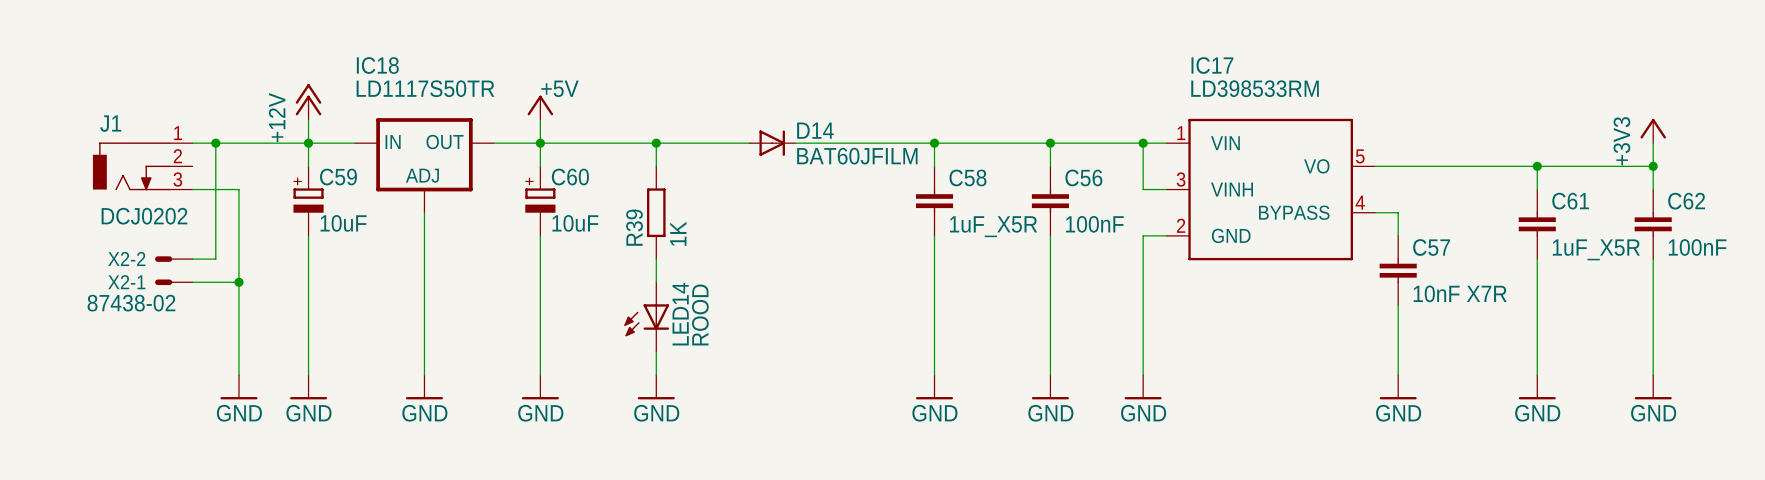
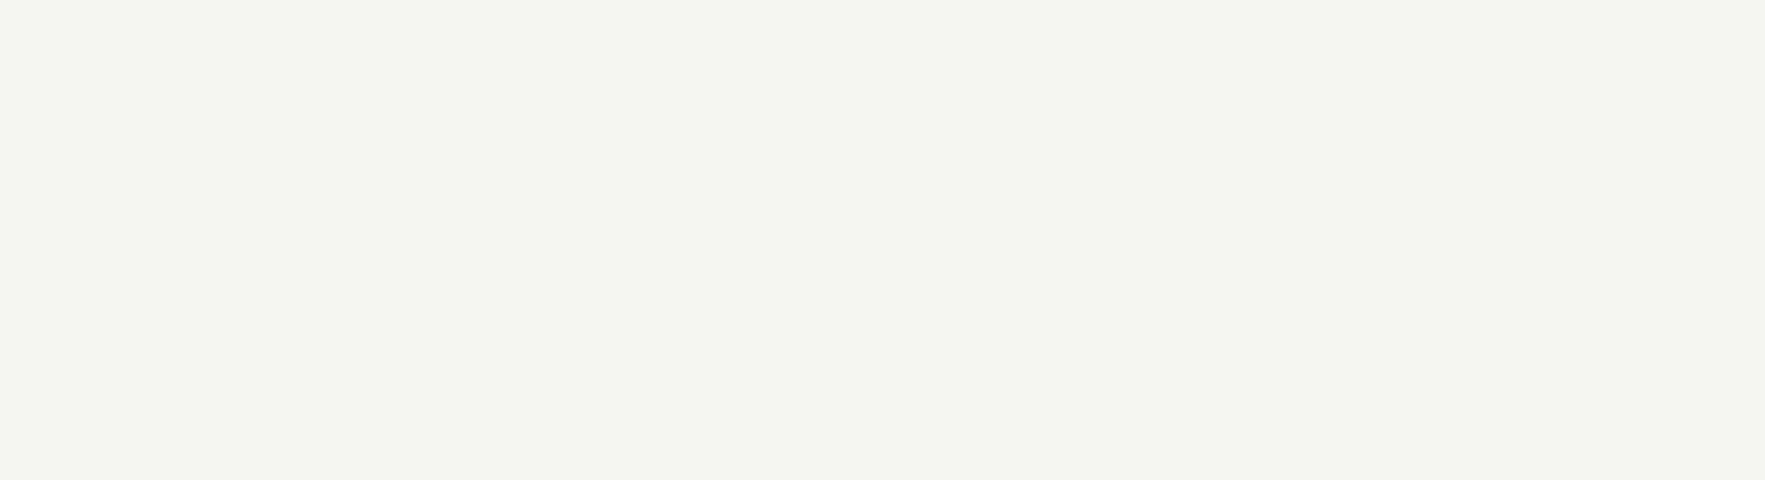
power symbol: +12V (308, 102) -> none
power symbol: +5V (540, 107) -> none
wire: (308, 119) (308, 166) -> none
wire: (540, 119) (540, 166) -> none
power symbol: +3V3 (1653, 131) -> none
wire: (192, 143) (354, 143) -> none
wire: (215, 143) (215, 259) (192, 259) -> none
junction: (215, 143) -> none
junction: (308, 143) -> none
wire: (494, 143) (749, 143) -> none
junction: (540, 143) -> none
wire: (656, 143) (656, 166) -> none
junction: (656, 143) -> none
D14: BAT60JFILM (772, 143) -> none
wire: (795, 143) (1166, 143) -> none
wire: (934, 143) (934, 166) -> none
junction: (934, 143) -> none
wire: (1050, 143) (1050, 166) -> none
junction: (1050, 143) -> none
wire: (1143, 143) (1143, 189) (1166, 189) -> none
junction: (1143, 143) -> none
wire: (1653, 143) (1653, 189) -> none
IC18: LD1117S50TR (424, 165) -> none
J1: DCJ0202 (142, 166) -> none
wire: (1375, 166) (1653, 166) -> none
wire: (1537, 166) (1537, 189) -> none
junction: (1537, 166) -> none
junction: (1653, 166) -> none
wire: (192, 189) (238, 189) (238, 375) -> none
IC17: LD398533RM (1270, 189) -> none
C59: 10uF (308, 201) -> none
C60: 10uF (540, 201) -> none
C58: 1uF_X5R (934, 201) -> none
C56: 100nF (1050, 201) -> none
wire: (424, 212) (424, 375) -> none
R39: 1K (656, 212) -> none
wire: (1375, 212) (1398, 212) (1398, 235) -> none
C61: 1uF_X5R (1537, 224) -> none
C62: 100nF (1653, 224) -> none
wire: (308, 235) (308, 375) -> none
wire: (540, 235) (540, 375) -> none
wire: (934, 235) (934, 375) -> none
wire: (1050, 235) (1050, 375) -> none
wire: (1166, 235) (1143, 235) (1143, 375) -> none
X2-2: (173, 259) -> none
wire: (656, 259) (656, 282) -> none
wire: (1537, 259) (1537, 375) -> none
wire: (1653, 259) (1653, 375) -> none
C57: 10nF X7R (1398, 270) -> none
X2-1: 87438-02 (173, 282) -> none
wire: (192, 282) (238, 282) -> none
junction: (238, 282) -> none
wire: (1398, 305) (1398, 375) -> none
LED14: ROOD (646, 317) -> none
wire: (656, 351) (656, 375) -> none
power symbol: GND (238, 387) -> none
power symbol: GND (308, 387) -> none
power symbol: GND (424, 387) -> none
power symbol: GND (540, 387) -> none
power symbol: GND (656, 387) -> none
power symbol: GND (934, 387) -> none
power symbol: GND (1050, 387) -> none
power symbol: GND (1143, 387) -> none
power symbol: GND (1398, 387) -> none
power symbol: GND (1537, 387) -> none
power symbol: GND (1653, 387) -> none

